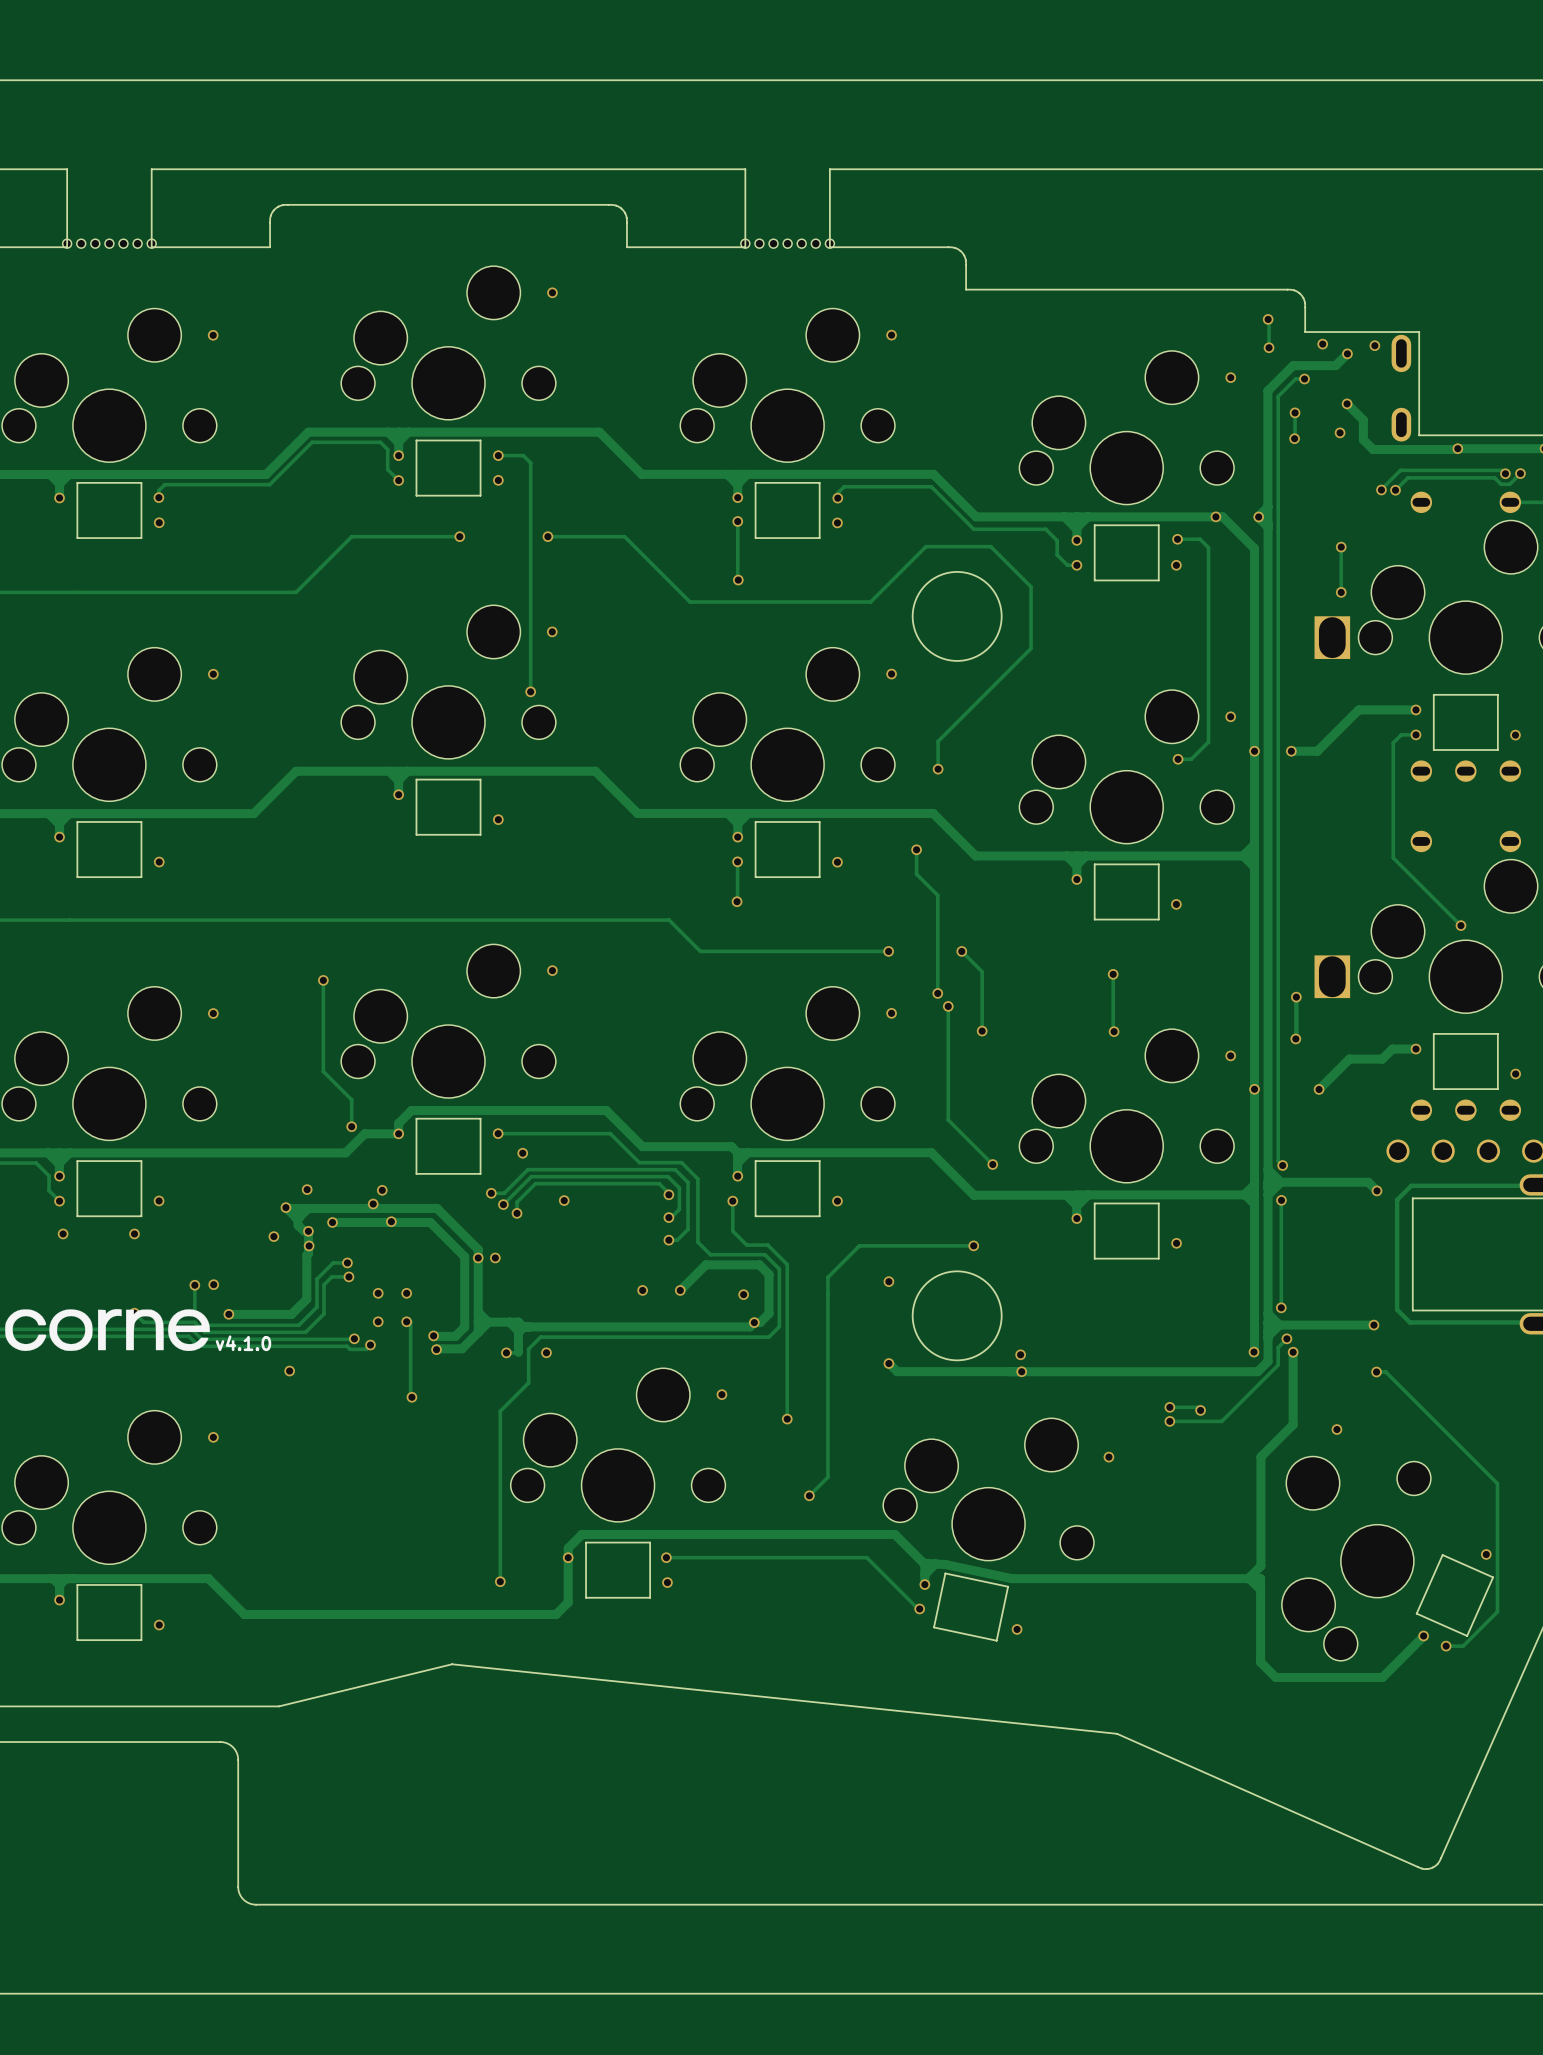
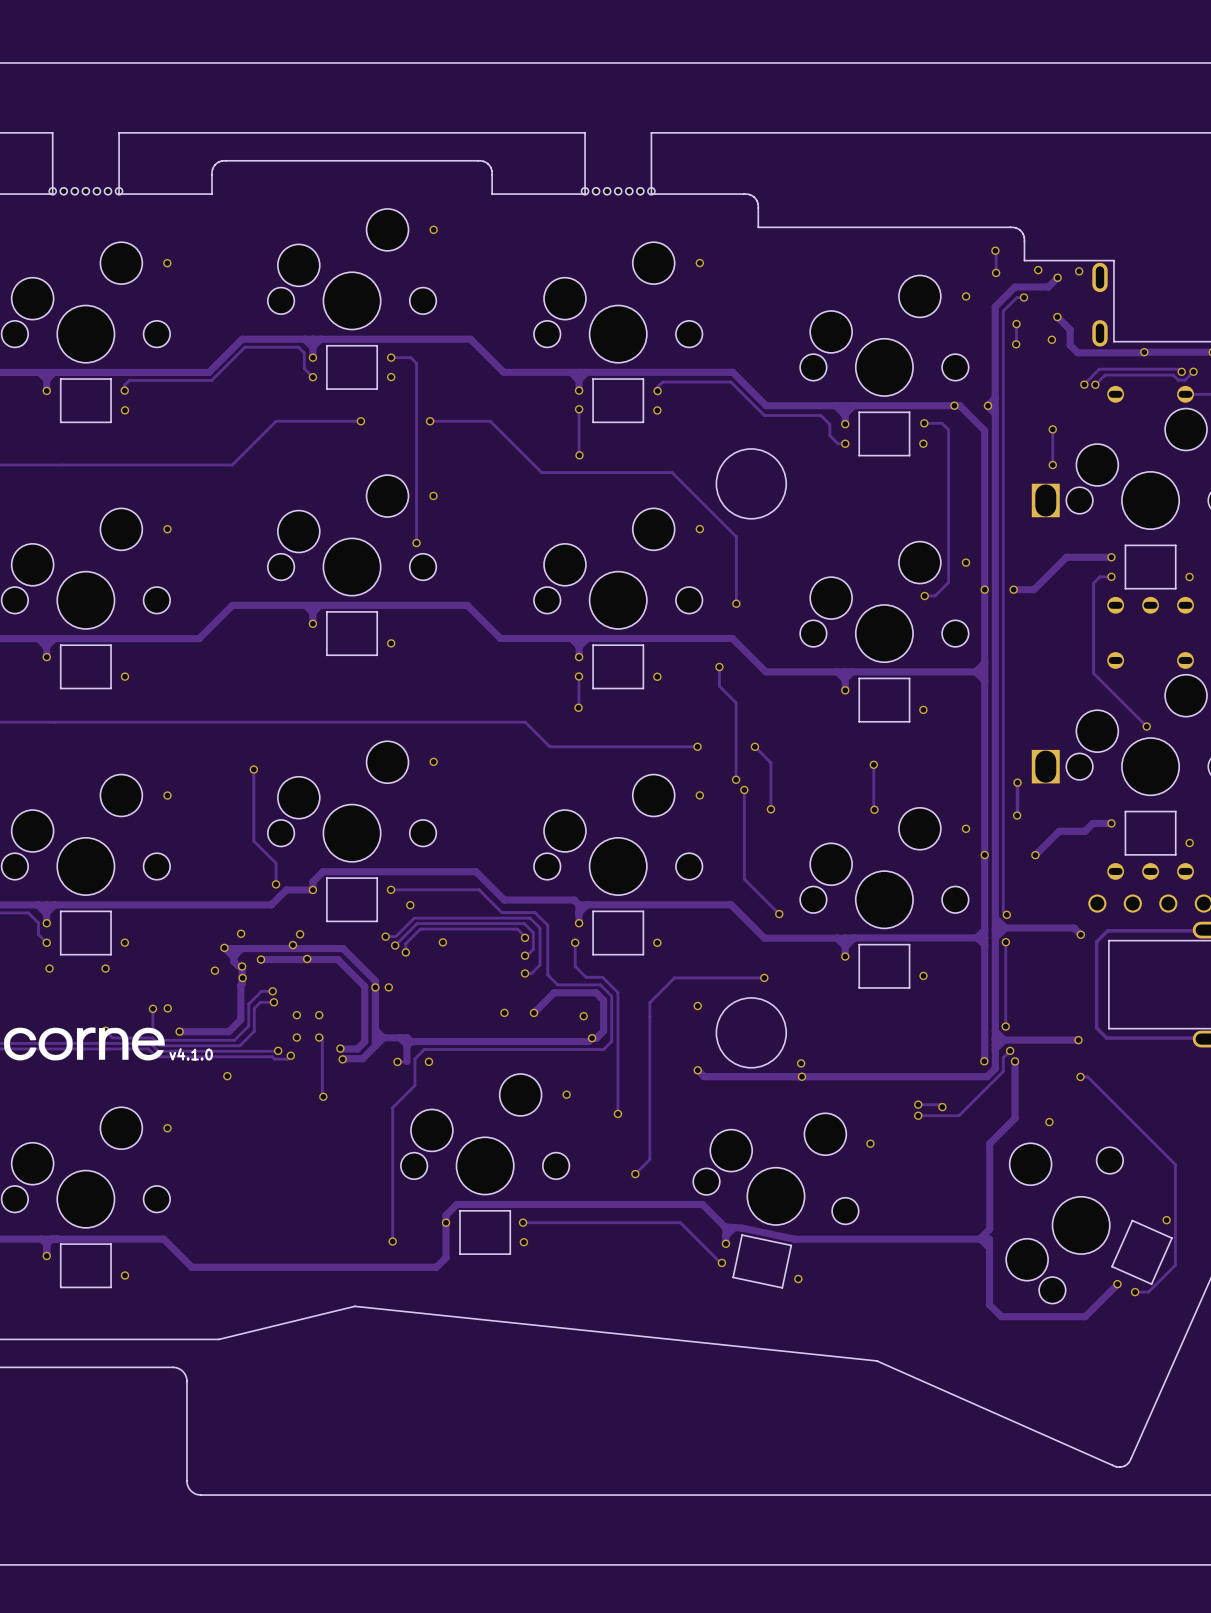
track: (856, 602) (870, 602) (926, 546) (990, 546) (1031, 586) (1031, 648) (938, 741) -> (672, 472) (736, 536) (736, 581)

